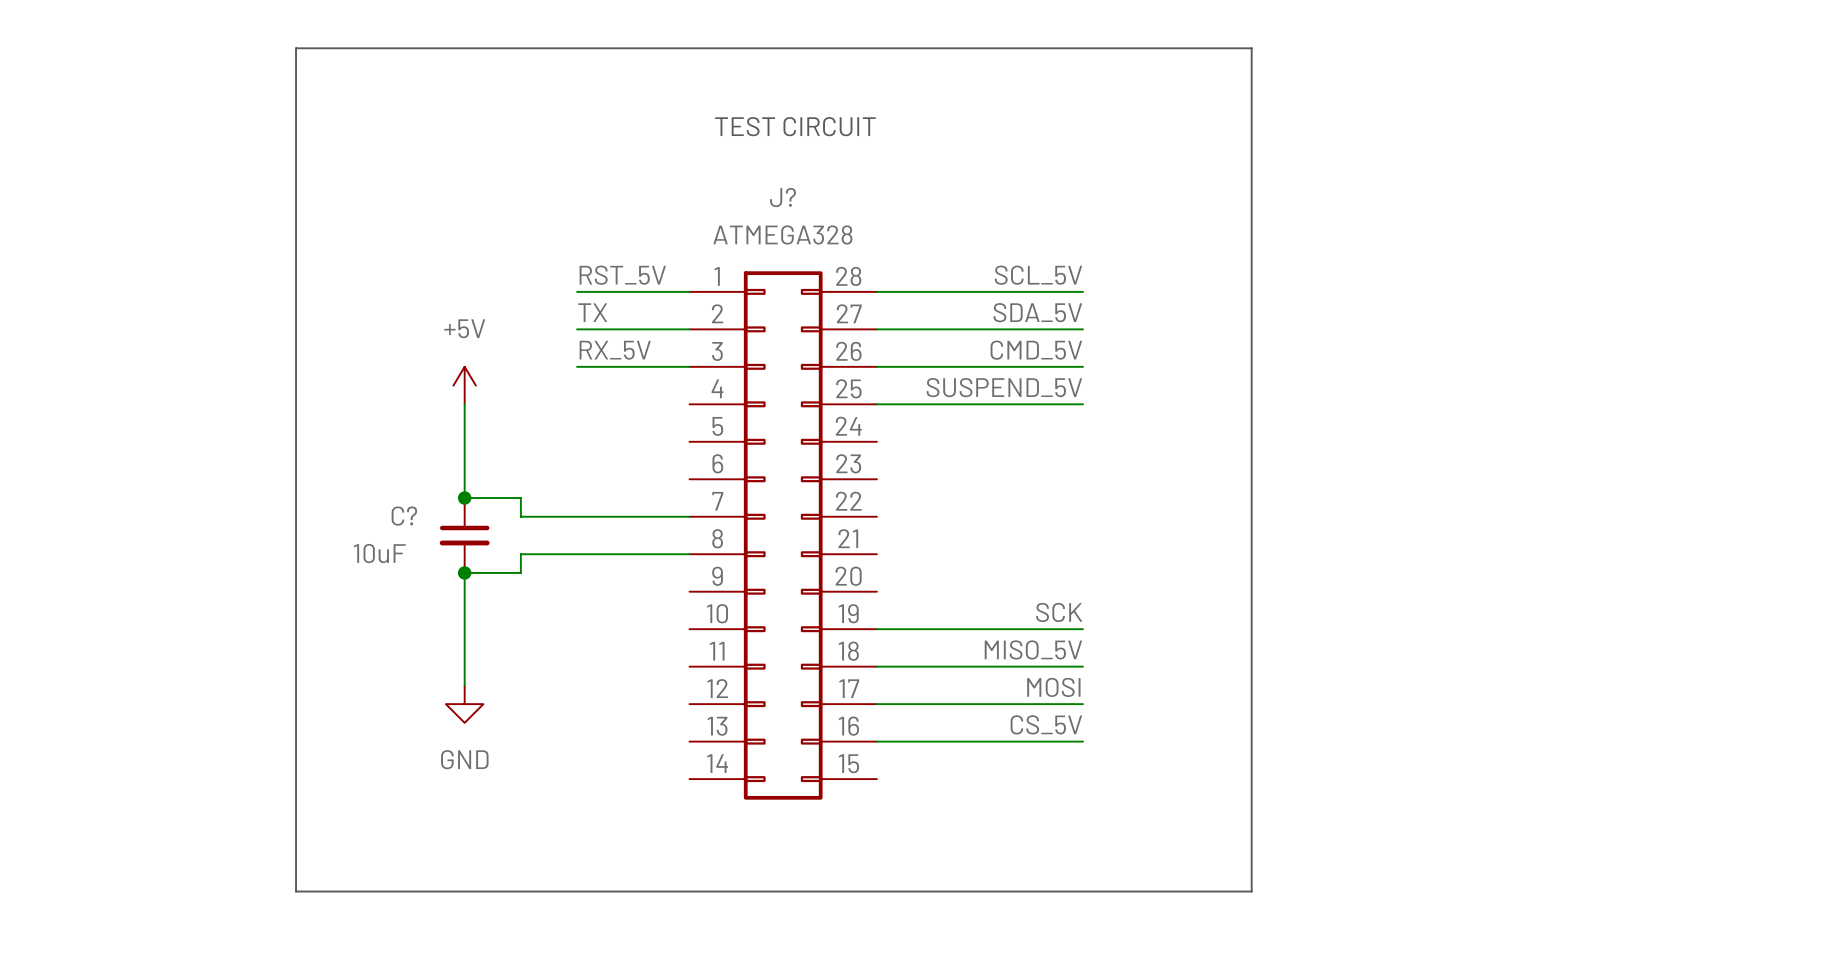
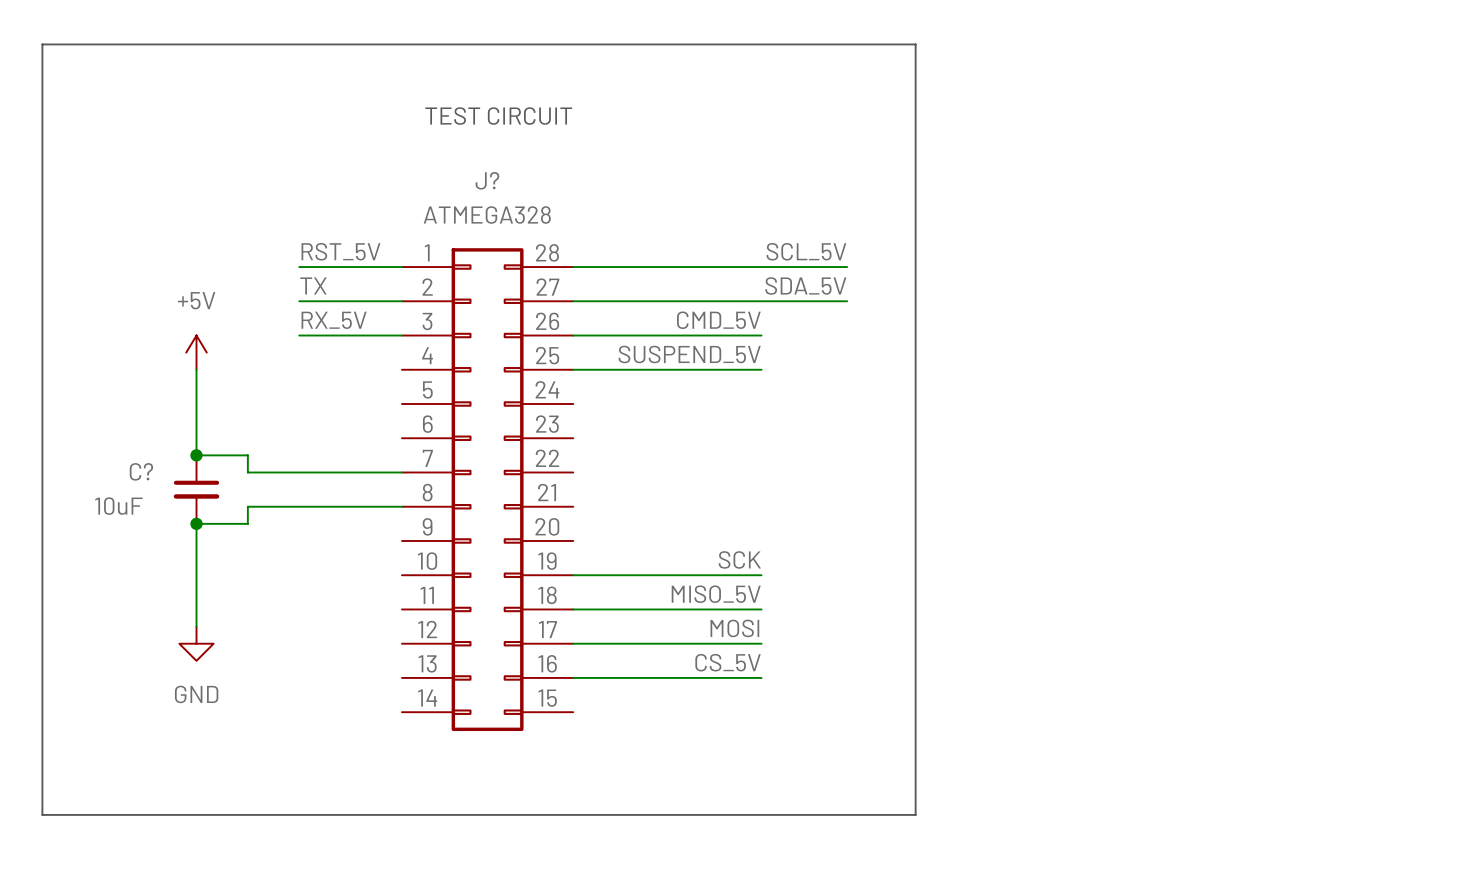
label position: SCL_5V (1038, 275) -> SCL_5V (806, 251)
wire: none -> (761, 267) (847, 267)
label position: SDA_5V (1037, 312) -> SDA_5V (805, 285)
wire: none -> (761, 301) (847, 301)

